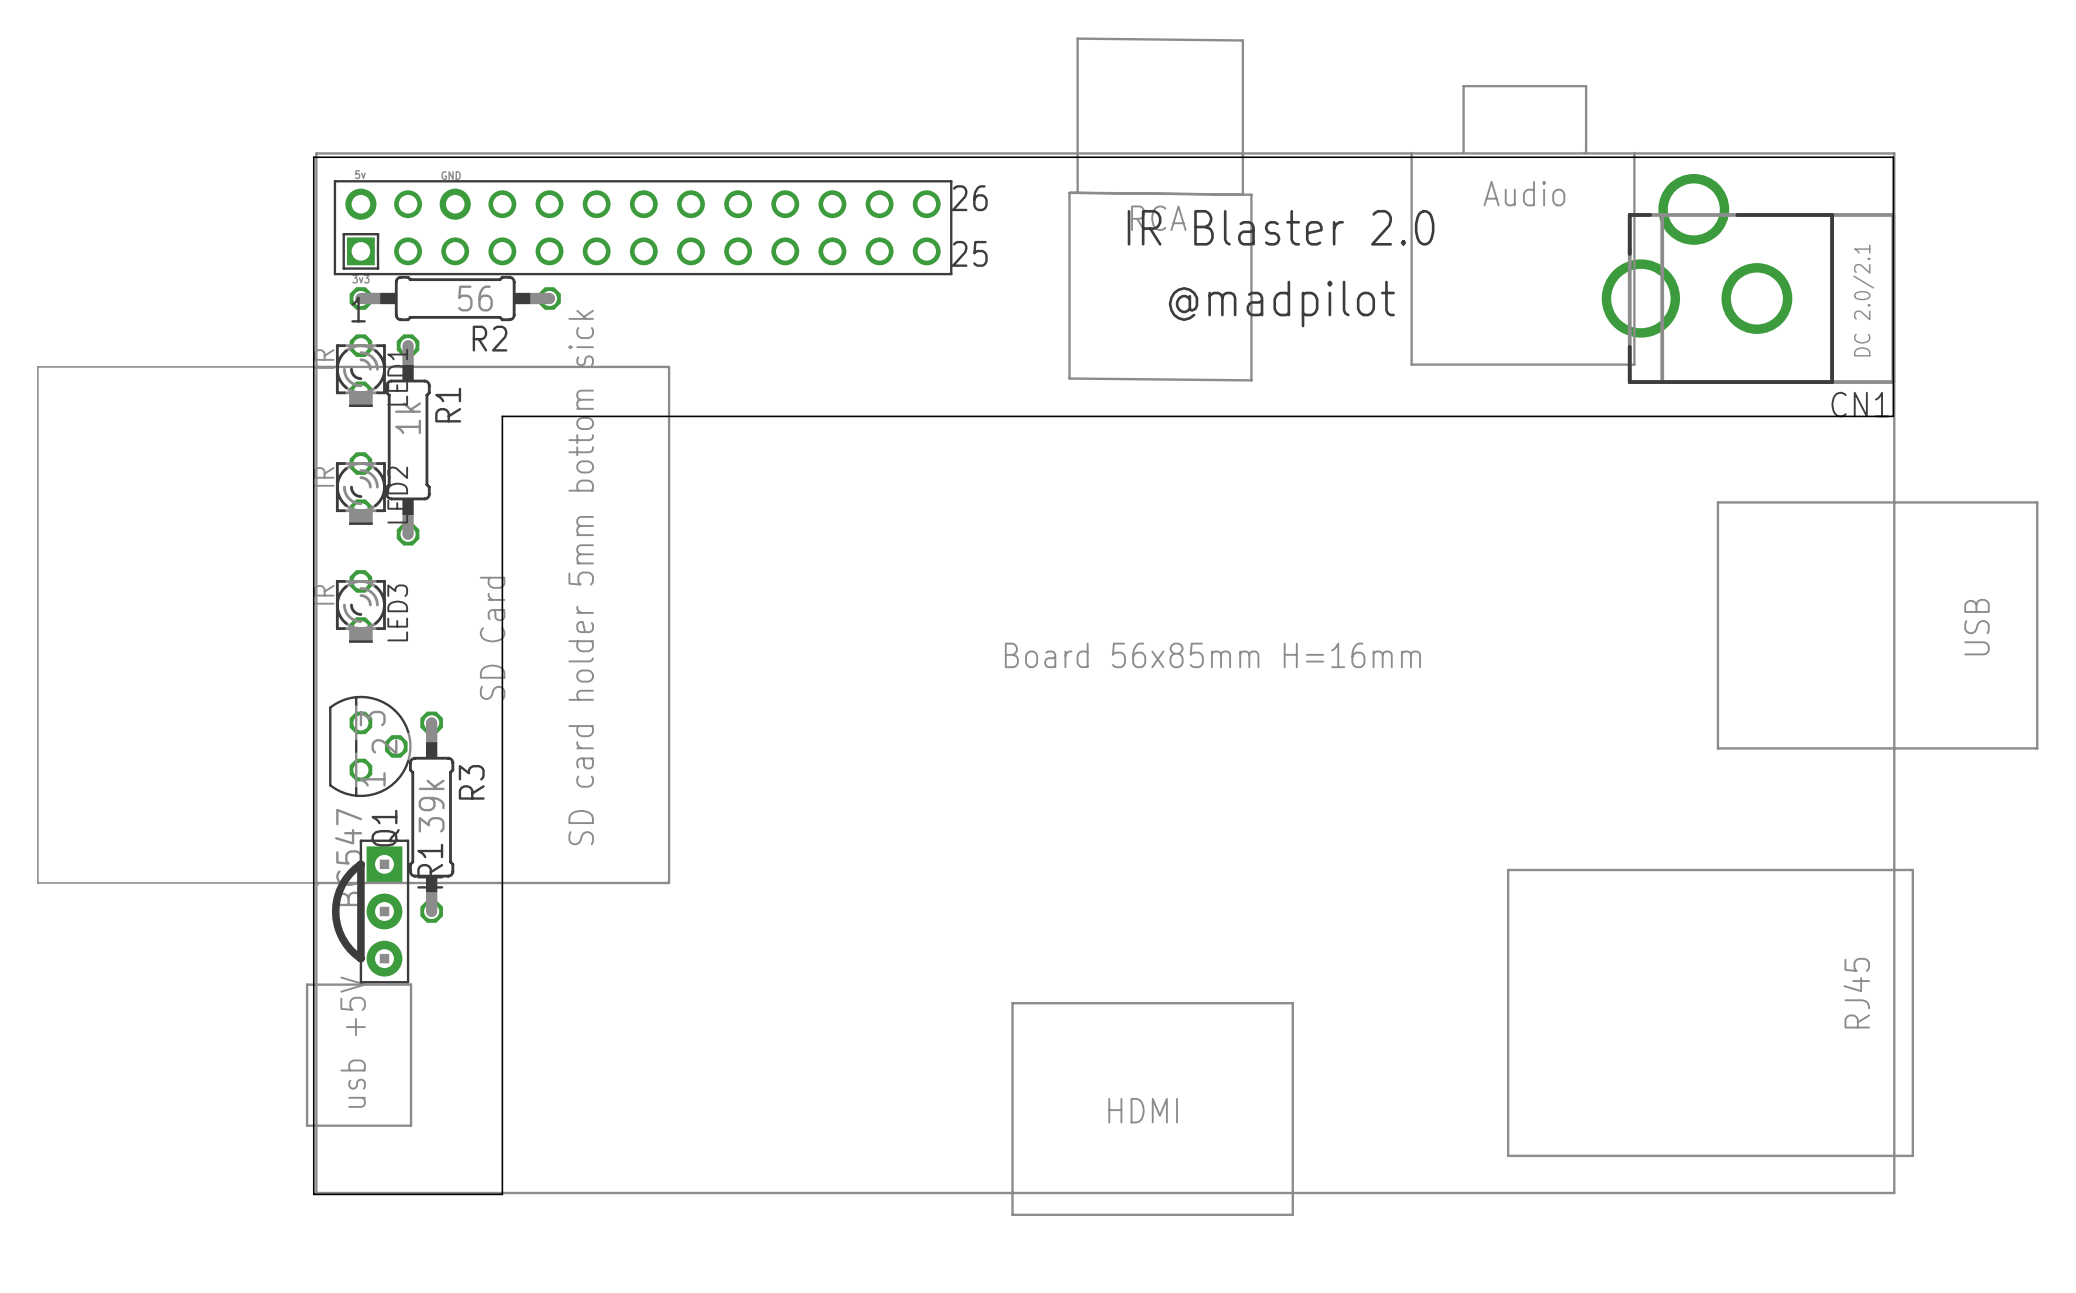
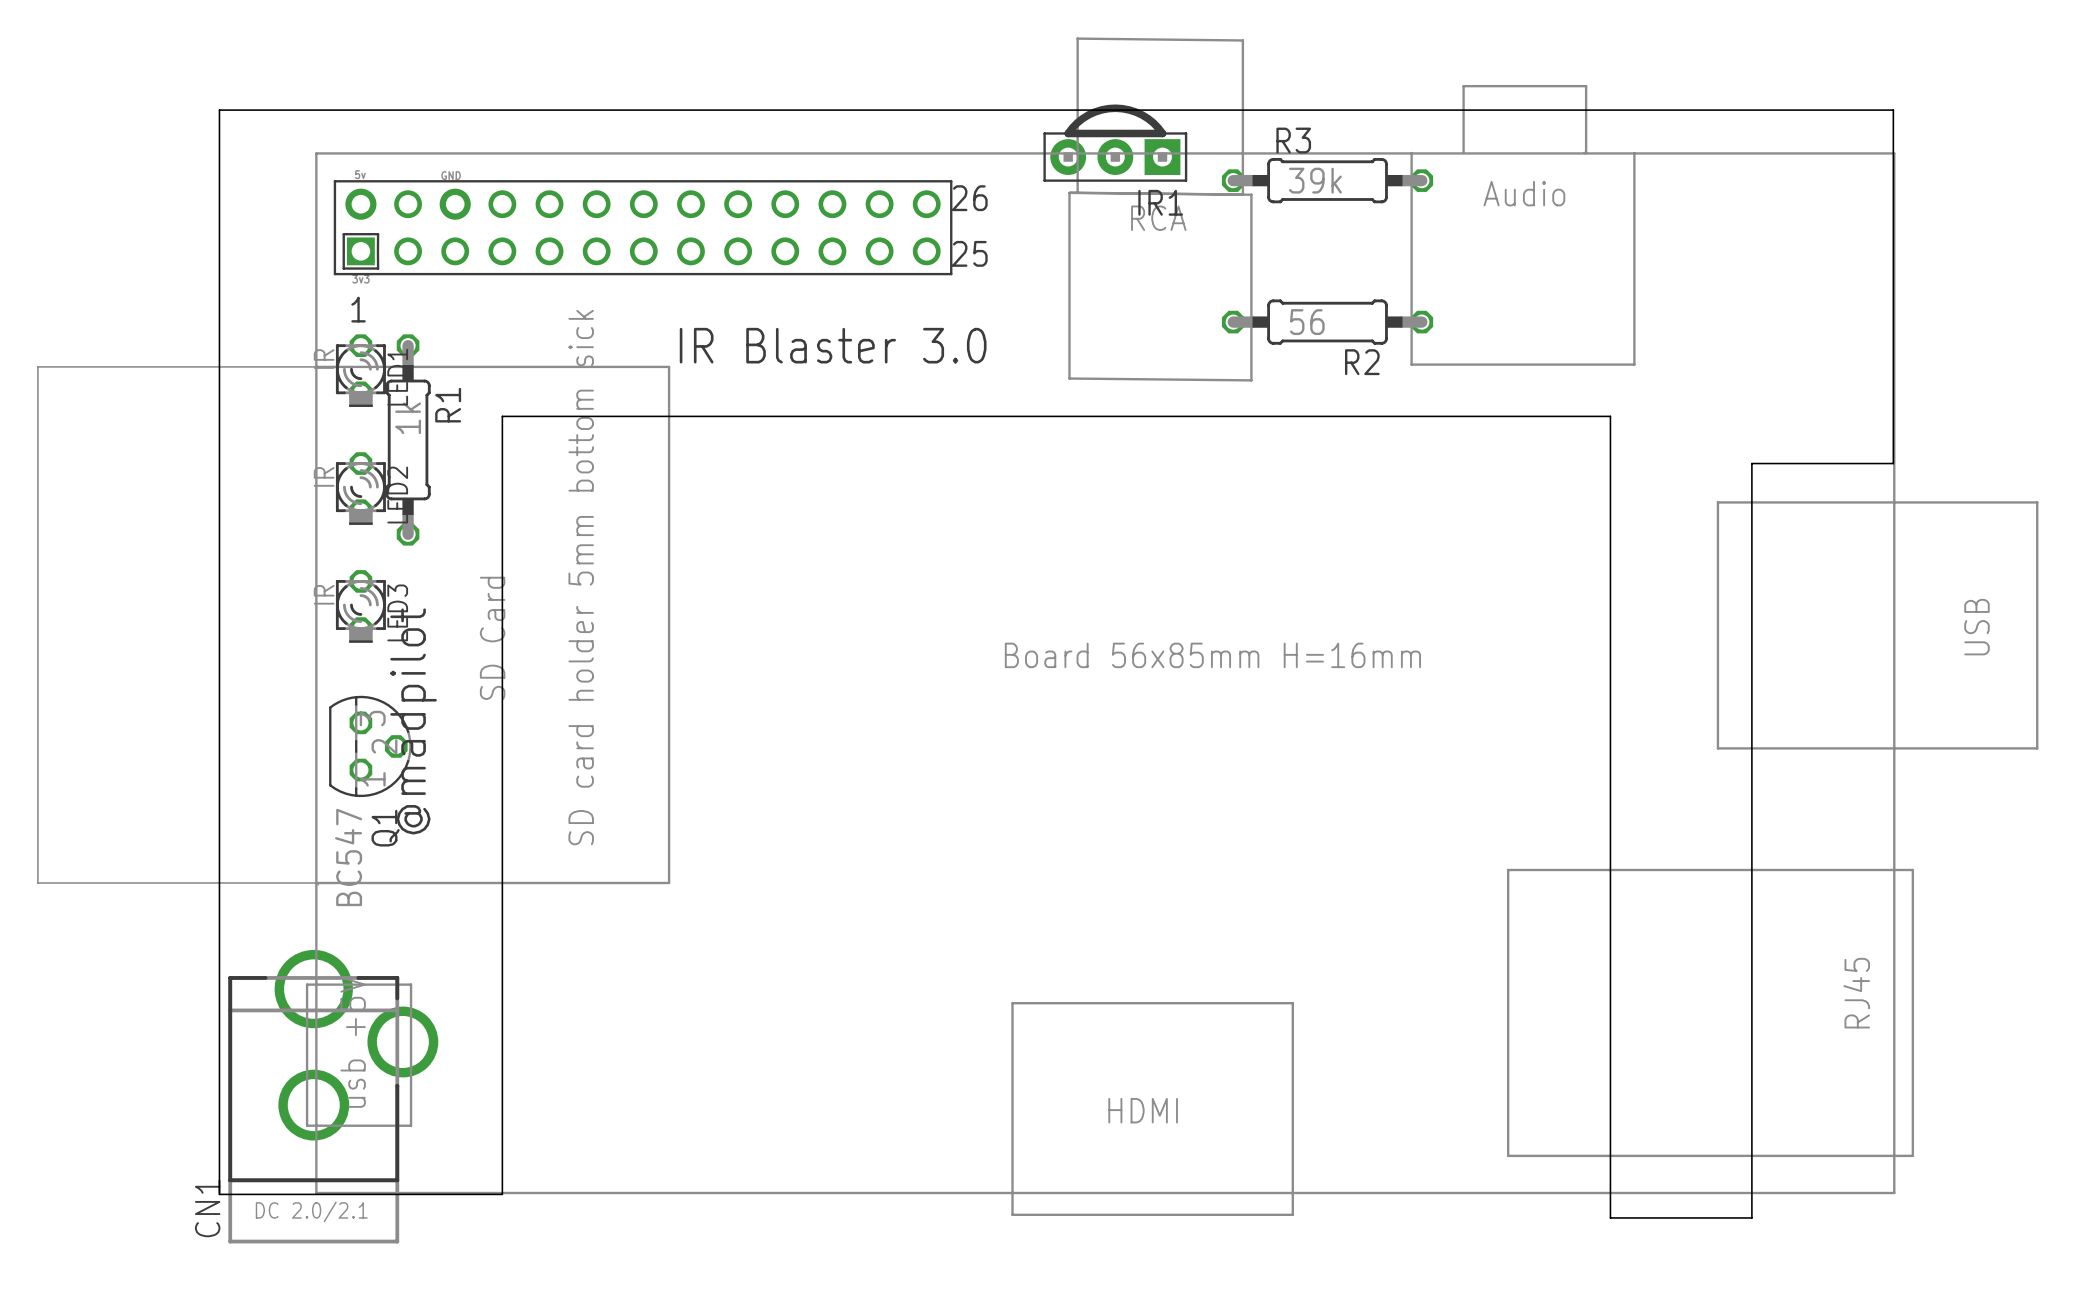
board edge: (1893, 157) (313, 157) (313, 1194) -> (1893, 157) (1893, 110) (219, 110) (219, 1194) (313, 1194)
text: IR Blaster 2.0 (1281, 227) -> none
CN1 rotation: 0° (1748, 278) -> 90° clockwise (333, 1096)
CN1 position: (1748, 278) -> (333, 1096)
R2 position: (455, 298) -> (1327, 322)
R2 value position: 56 (475, 298) -> 56 (1307, 322)
text: @madpilot (1281, 304) -> none
text: none -> IR Blaster 3.0 (833, 345)
board edge: (1610, 416) (1893, 416) -> (1610, 416) (1610, 1217) (1751, 1217) (1751, 463) (1893, 463) (1893, 416)
text: none -> @madpilot (413, 721)
R3 name position: R3 (471, 782) -> R3 (1293, 140)
R3 rotation: 0° (431, 817) -> 90° clockwise (1327, 180)
R3 position: (431, 817) -> (1327, 180)
IR1 rotation: 0° (370, 911) -> 90° clockwise (1115, 143)
IR1 position: (370, 911) -> (1115, 143)

